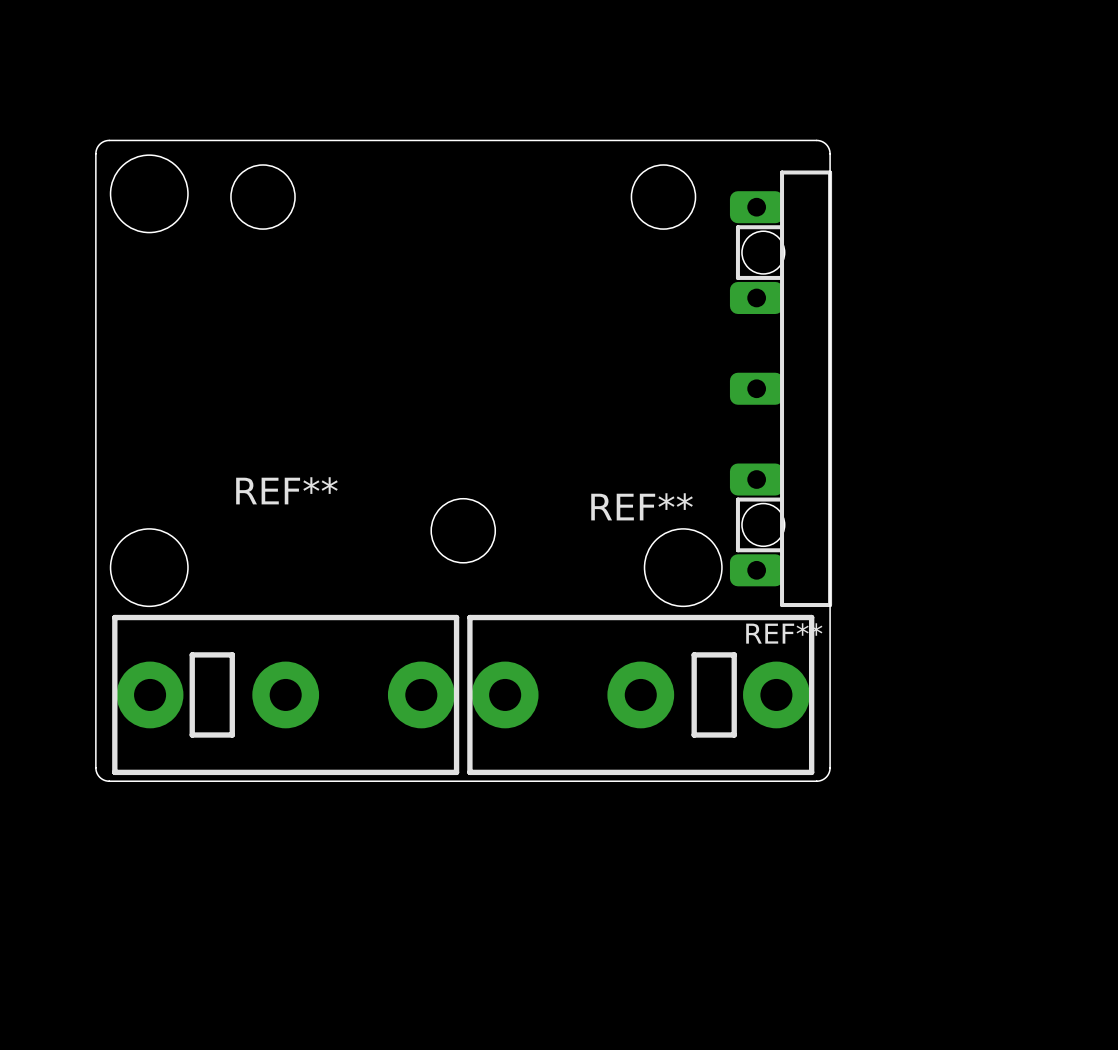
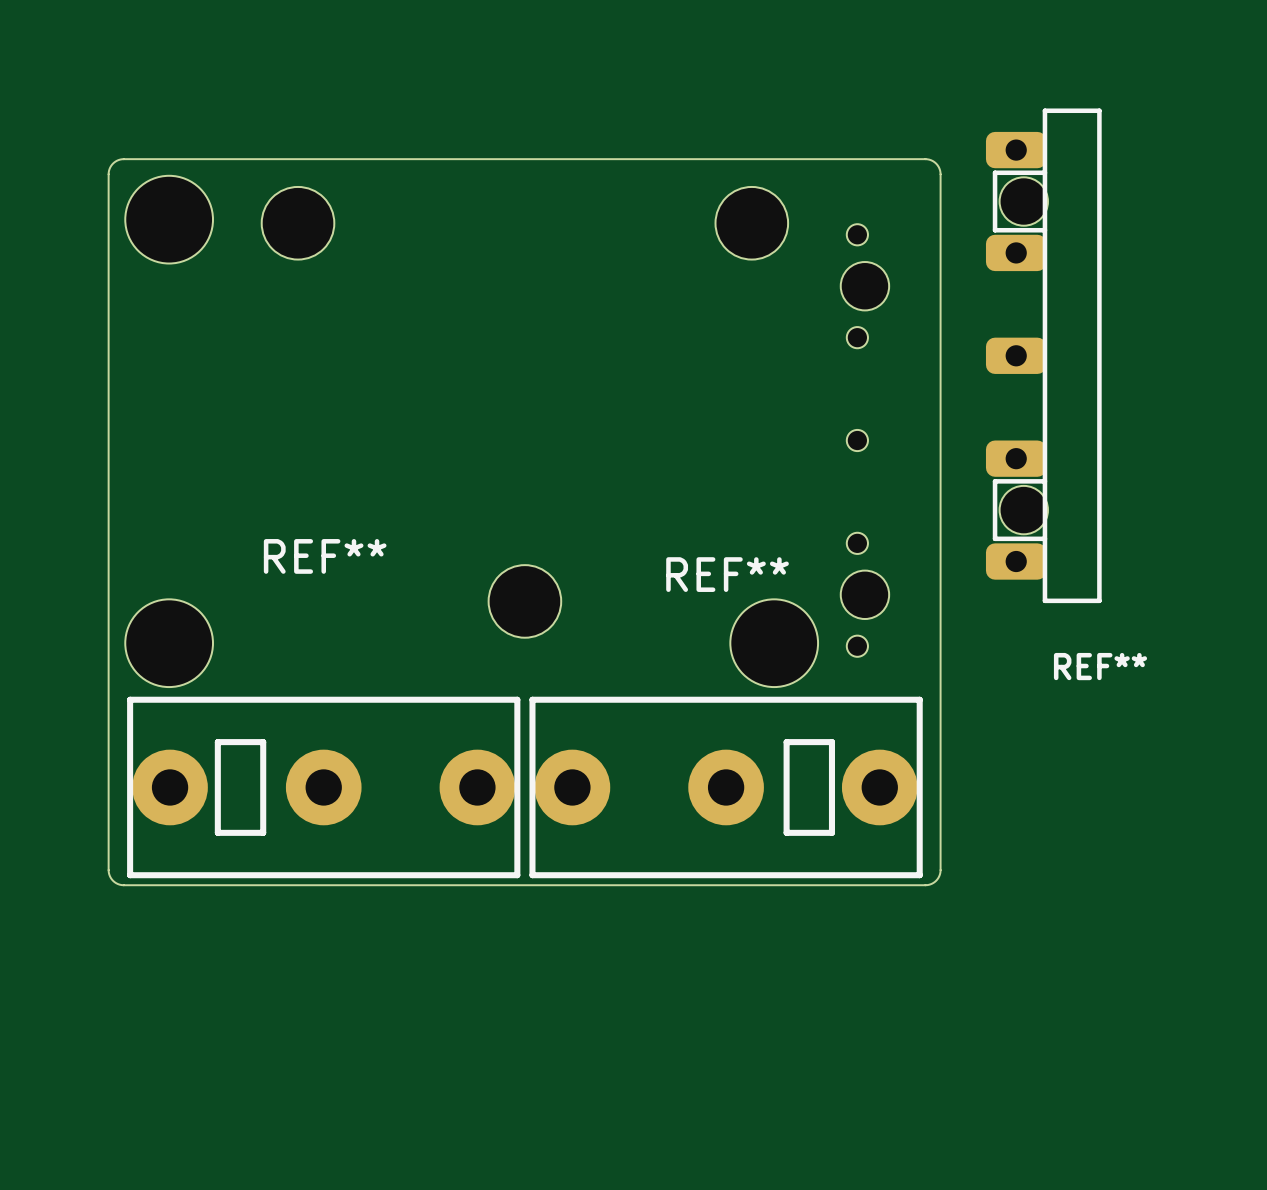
part: none -> (857, 234)
part: none -> (864, 286)
part: none -> (857, 337)
part: none -> (857, 440)
REF** position: (781, 388) -> (1043, 355)
part: none -> (857, 543)
part: none -> (864, 594)
part: none -> (857, 646)
REF** name position: REF** (784, 633) -> REF** (1100, 666)

